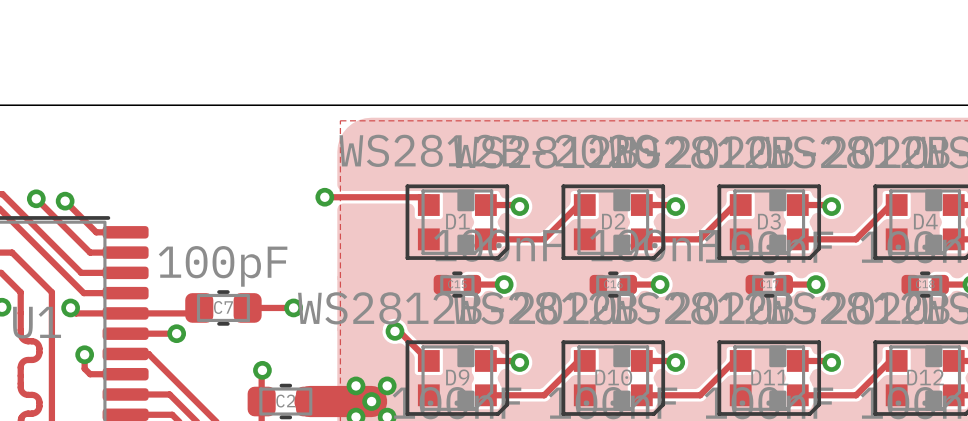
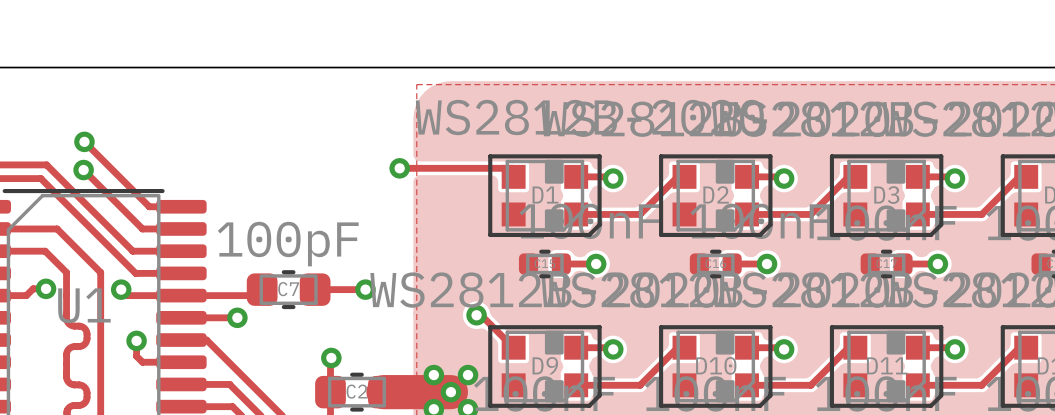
track: none -> (84, 141) (115, 172)
via position: (65, 201) -> (84, 141)

